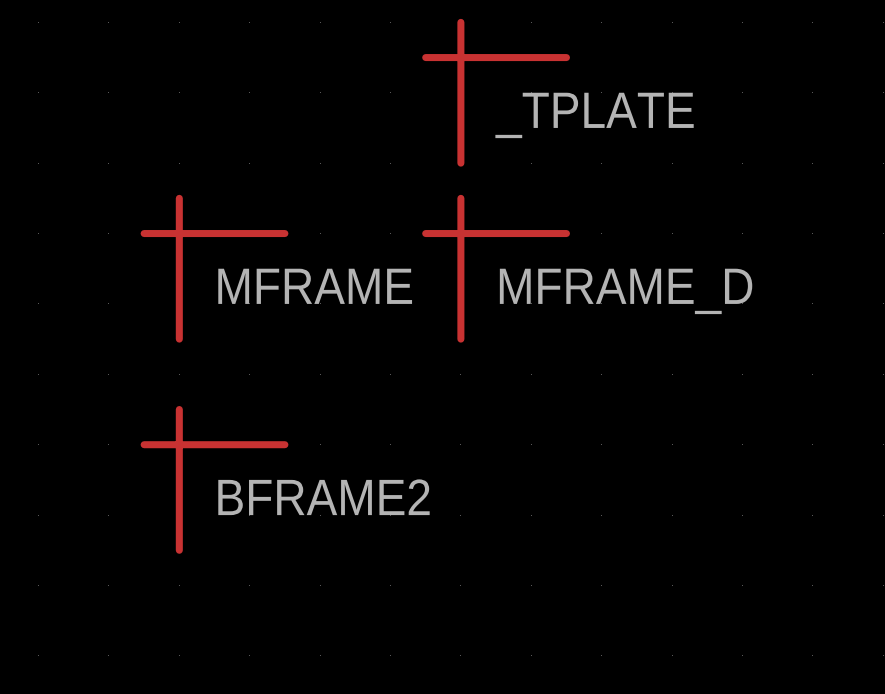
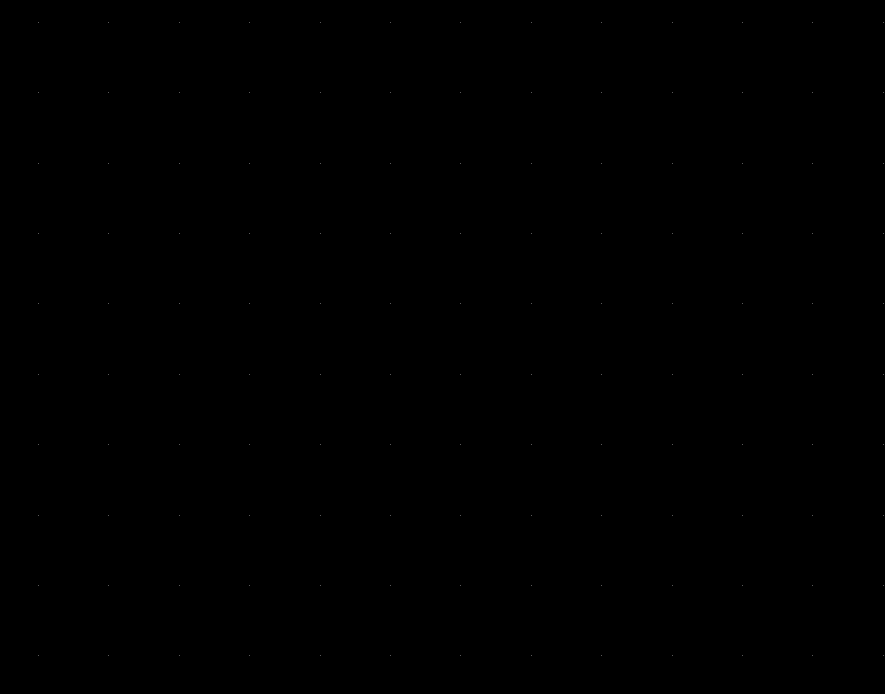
_TPLATE: (496, 92) -> none
MFRAME: (214, 268) -> none
MFRAME_D: (496, 268) -> none
BFRAME2: (214, 479) -> none

